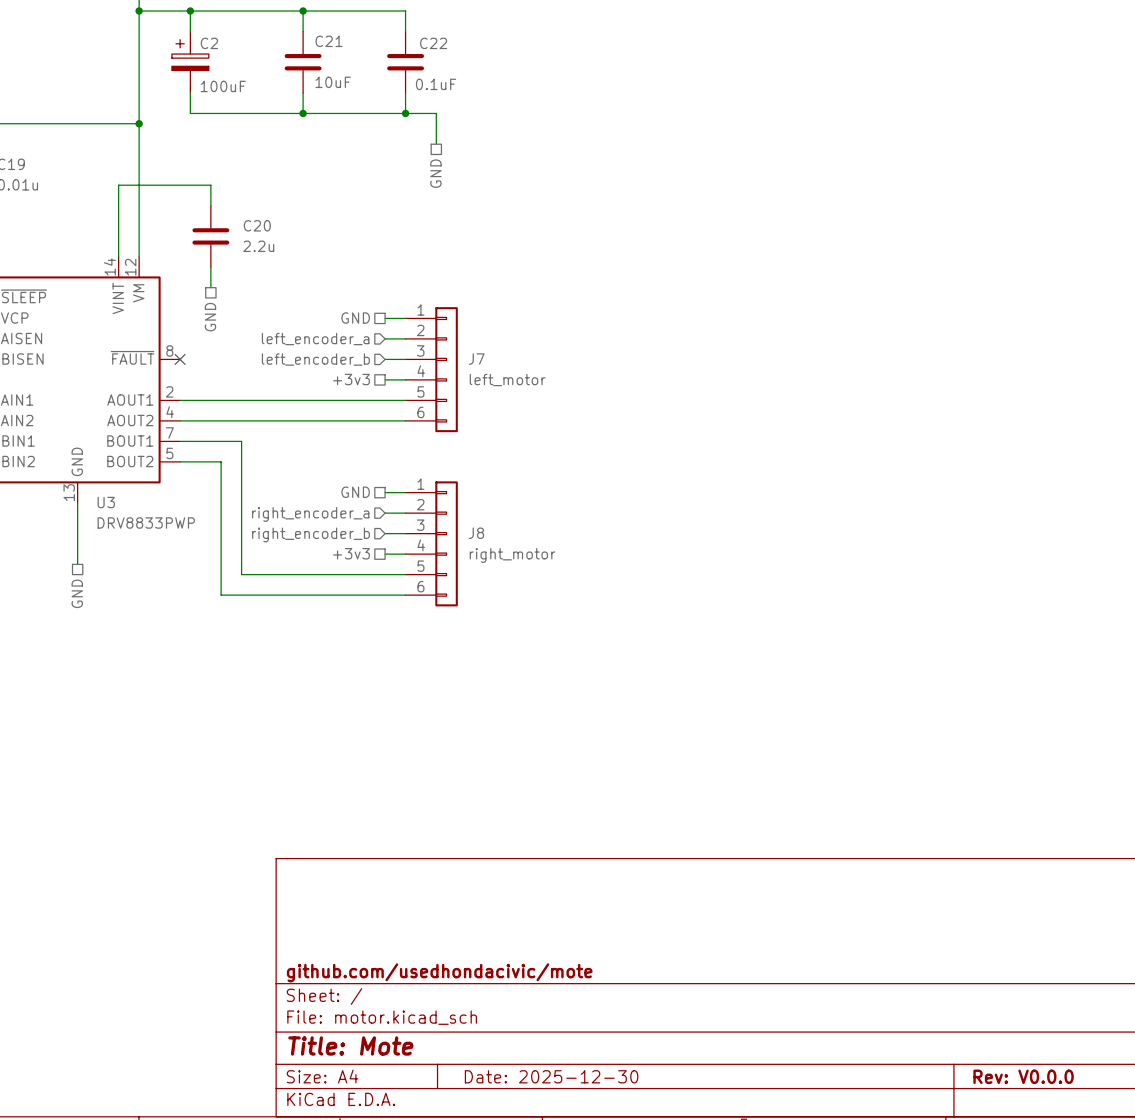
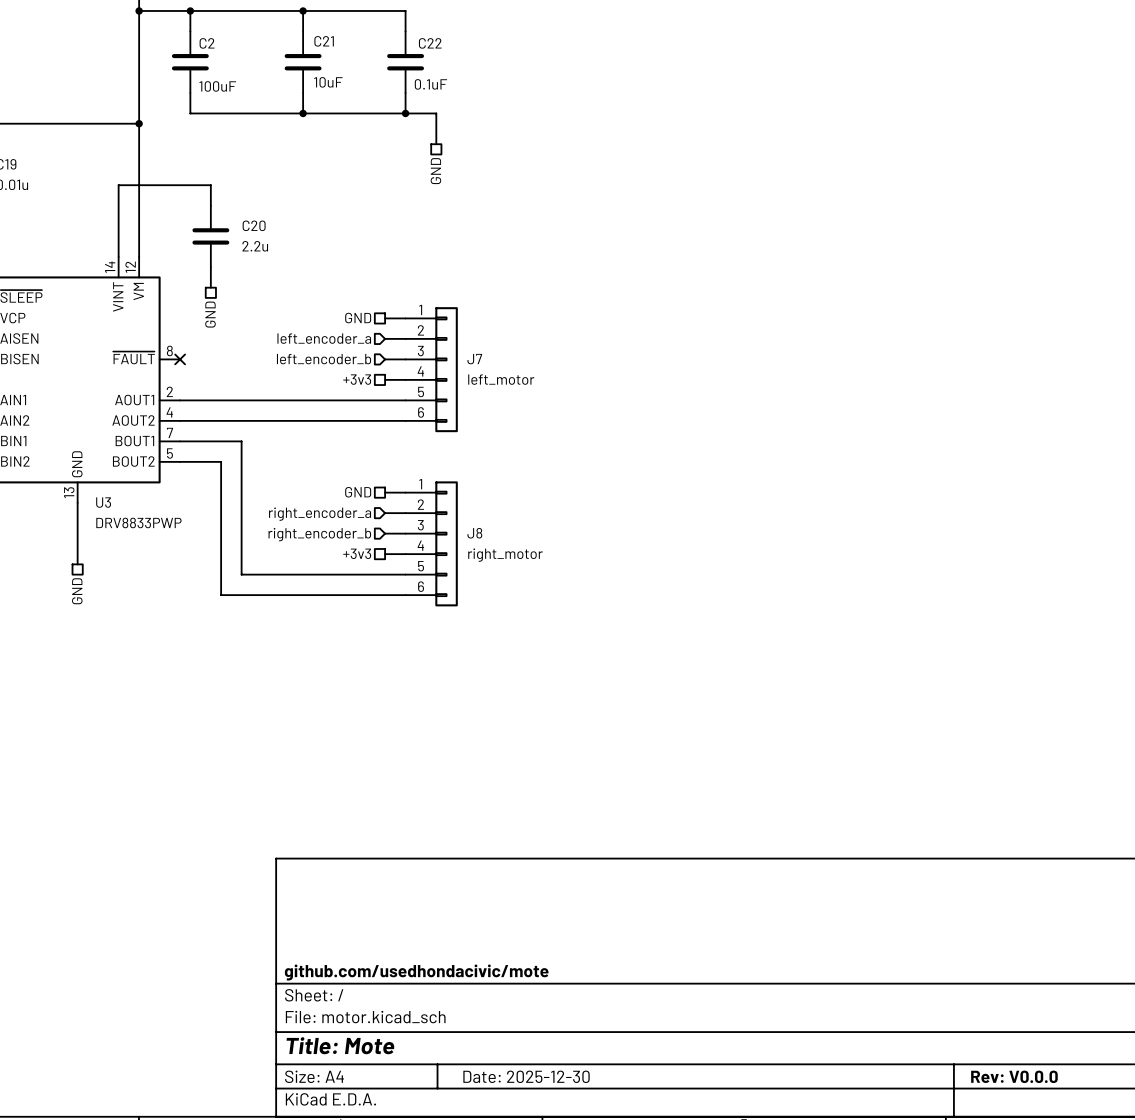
C2 symbol: [171, 31, 209, 93] -> [171, 31, 209, 93]

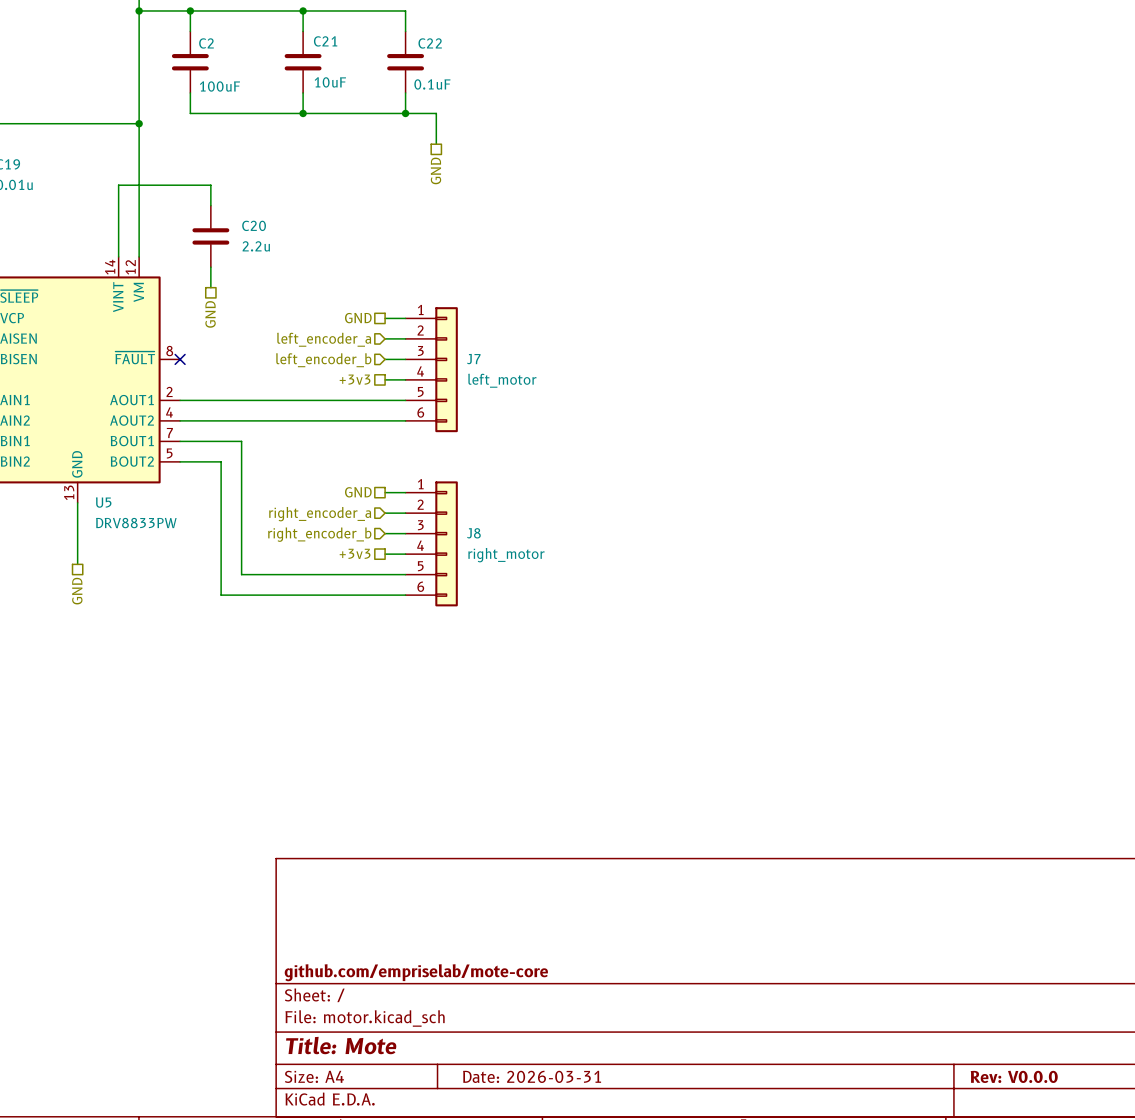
U3 name: U3 (103, 502) -> U5 (103, 502)
U3 value: DRV8833PWP (138, 522) -> DRV8833PW (136, 523)
title block: github.com/usedhondacivic/mote (416, 972) -> github.com/empriselab/mote-core (416, 972)
title block: Date: 2025-12-30 (526, 1076) -> Date: 2026-03-31 (532, 1076)

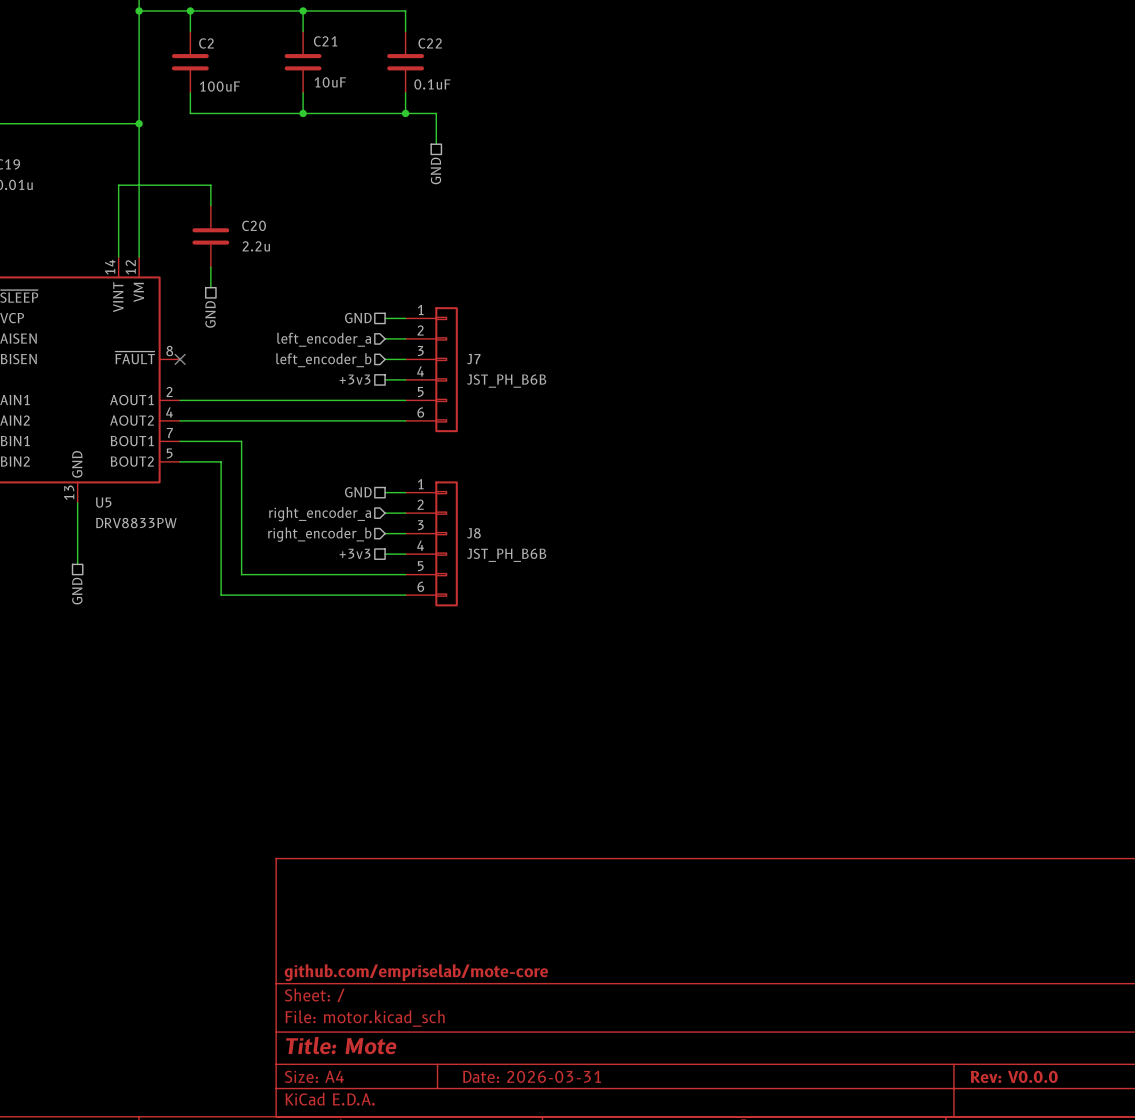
J7 value: left_motor (502, 380) -> JST_PH_B6B (506, 381)
J8 value: right_motor (506, 555) -> JST_PH_B6B (506, 555)

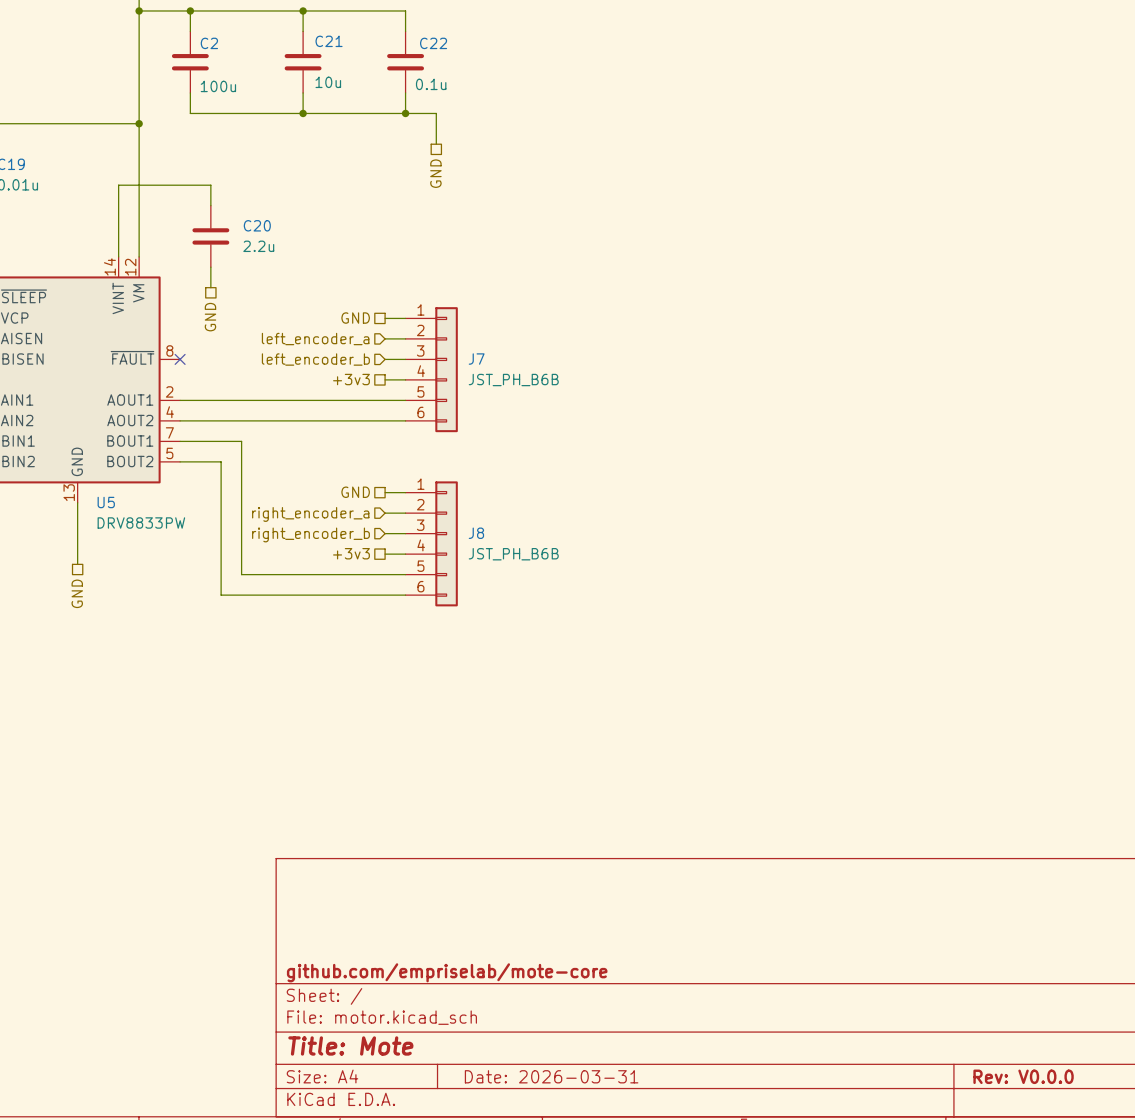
C21 value: 10uF (330, 82) -> 10u (328, 82)
C22 value: 0.1uF (432, 84) -> 0.1u (431, 84)
C2 value: 100uF (219, 86) -> 100u (218, 86)

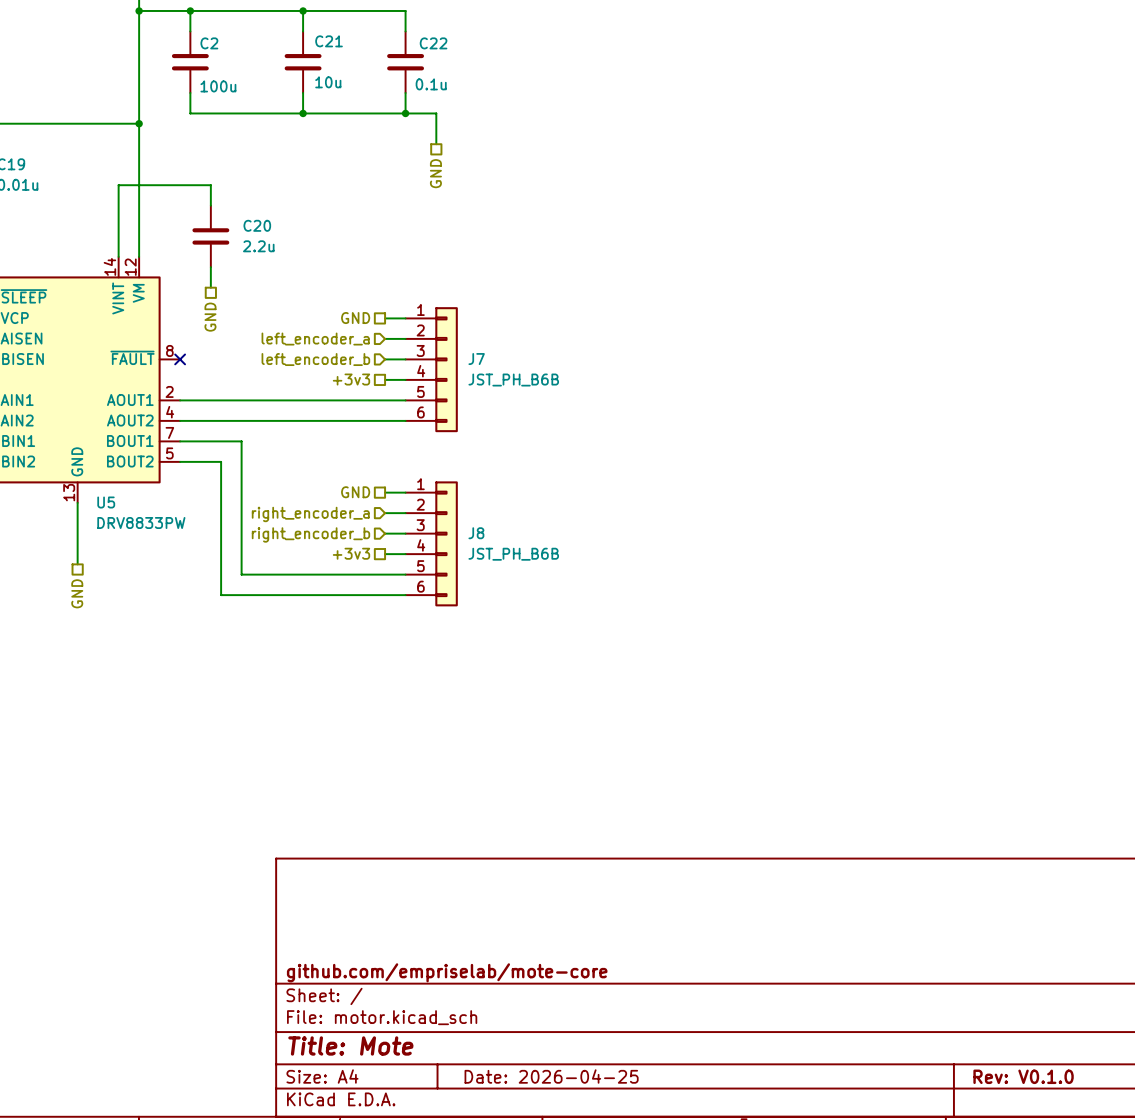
title block: Date: 2026-03-31 (551, 1076) -> Date: 2026-04-25 (551, 1076)
title block: Rev: V0.0.0 (1023, 1076) -> Rev: V0.1.0 (1023, 1076)

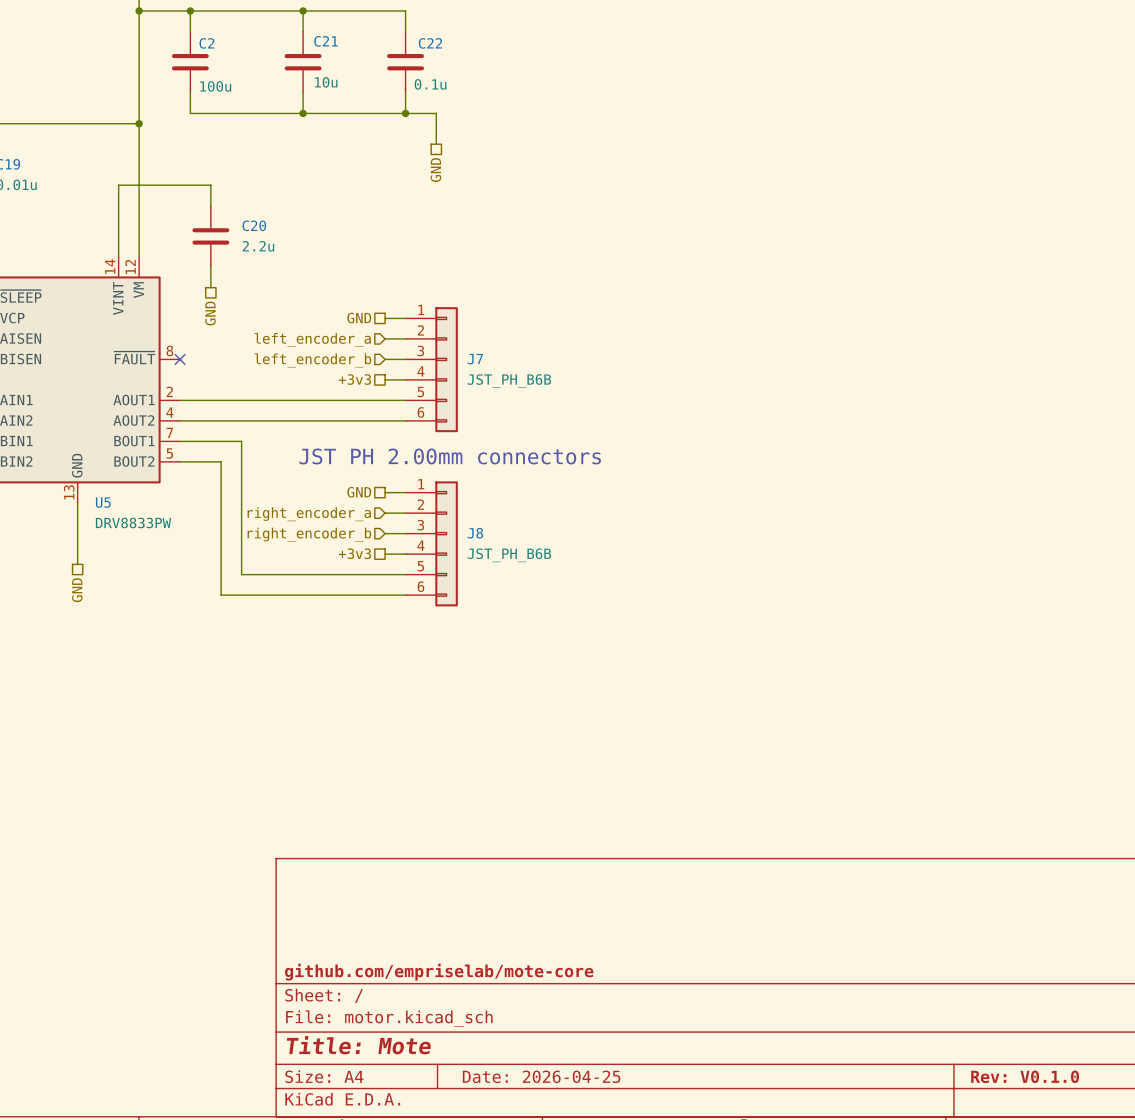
text: none -> JST PH 2.00mm connectors (450, 456)

